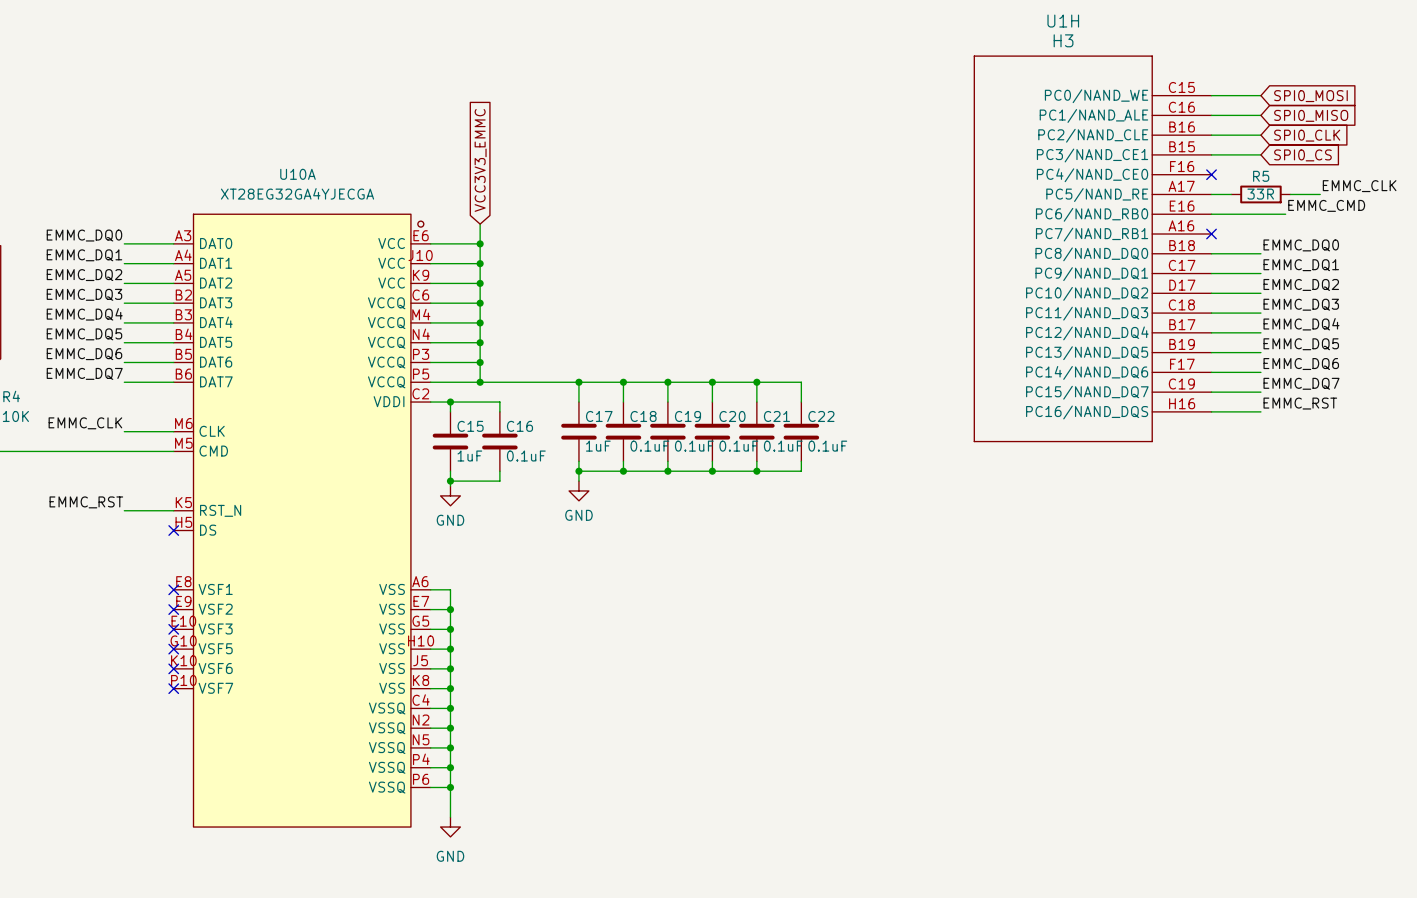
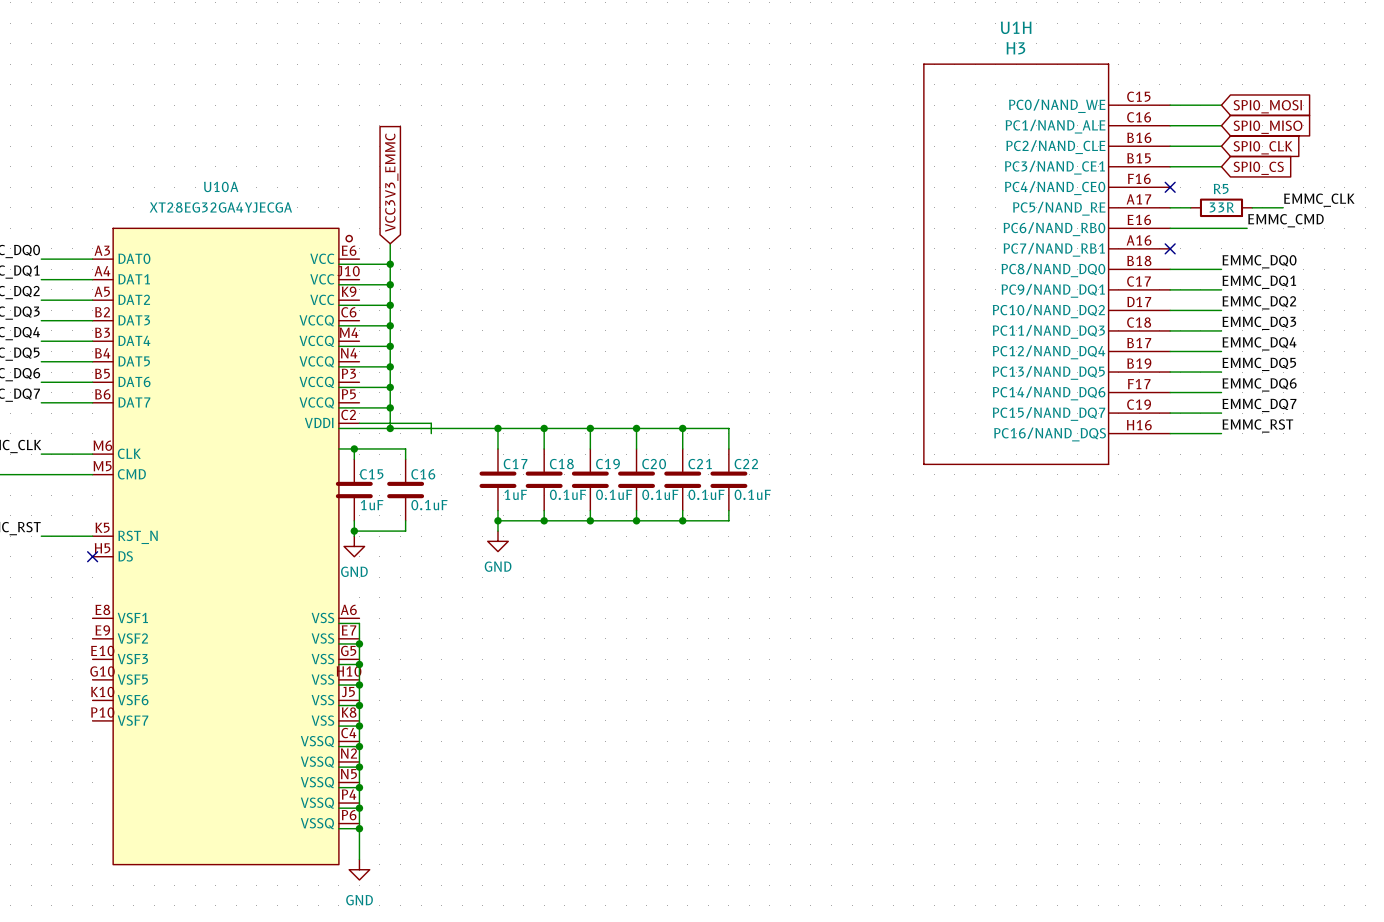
global label position: VCC3V3_EMMC (480, 160) -> VCC3V3_EMMC (391, 182)
wire: (480, 224) (480, 382) -> none
wire: none -> (390, 243) (390, 428)
wire: (430, 243) (480, 243) -> (338, 264) (390, 264)
junction: (480, 243) -> none
junction: none -> (390, 264)
wire: (430, 263) (480, 263) -> (338, 284) (390, 284)
junction: (480, 263) -> none
junction: none -> (390, 284)
wire: (430, 283) (480, 283) -> (338, 305) (390, 305)
junction: (480, 283) -> none
junction: none -> (390, 305)
wire: (430, 303) (480, 303) -> (338, 325) (390, 325)
junction: (480, 303) -> none
junction: none -> (390, 325)
wire: (430, 322) (480, 322) -> (338, 346) (390, 346)
junction: (480, 322) -> none
junction: none -> (390, 346)
wire: (430, 342) (480, 342) -> (338, 366) (390, 366)
junction: (480, 342) -> none
junction: none -> (390, 366)
wire: (430, 362) (480, 362) -> (338, 387) (390, 387)
junction: (480, 362) -> none
junction: none -> (390, 387)
wire: (430, 382) (801, 382) (801, 402) -> none
junction: (480, 382) -> none
wire: (578, 382) (578, 402) -> (497, 428) (497, 448)
junction: (578, 382) -> none
wire: (623, 382) (623, 402) -> (544, 428) (544, 448)
junction: (623, 382) -> none
wire: (667, 382) (667, 402) -> (590, 428) (590, 448)
junction: (667, 382) -> none
wire: (712, 382) (712, 402) -> (636, 428) (636, 448)
junction: (712, 382) -> none
wire: (756, 382) (756, 402) -> (682, 428) (682, 448)
junction: (756, 382) -> none
wire: none -> (338, 407) (390, 407)
junction: none -> (390, 407)
wire: (450, 402) (450, 411) -> (354, 448) (354, 459)
junction: (450, 402) -> none
wire: none -> (338, 428) (728, 428) (728, 448)
junction: none -> (390, 428)
junction: none -> (497, 428)
junction: none -> (544, 428)
junction: none -> (590, 428)
junction: none -> (636, 428)
junction: none -> (682, 428)
wire: none -> (338, 448) (405, 448) (405, 459)
junction: none -> (354, 448)
C17 position: (578, 431) -> (497, 479)
C18 position: (623, 431) -> (544, 479)
C19 position: (667, 431) -> (590, 479)
C20 position: (712, 431) -> (636, 479)
C21 position: (756, 431) -> (682, 479)
C22 position: (801, 431) -> (728, 479)
C15 position: (450, 441) -> (354, 490)
C16 position: (499, 441) -> (405, 490)
wire: (578, 461) (578, 481) -> (497, 510) (497, 531)
wire: (623, 461) (623, 471) -> (544, 510) (544, 520)
wire: (667, 461) (667, 471) -> (590, 510) (590, 520)
wire: (712, 461) (712, 471) -> (636, 510) (636, 520)
wire: (756, 461) (756, 471) -> (682, 510) (682, 520)
wire: (801, 461) (801, 471) (578, 471) -> (728, 510) (728, 520) (497, 520)
wire: (450, 471) (450, 486) -> (354, 520) (354, 536)
wire: (499, 471) (499, 481) (450, 481) -> (405, 520) (405, 531) (354, 531)
junction: (578, 471) -> none
junction: (623, 471) -> none
junction: (667, 471) -> none
junction: (712, 471) -> none
junction: (756, 471) -> none
junction: (450, 481) -> none
power symbol position: GND (578, 490) -> GND (497, 541)
power symbol position: GND (450, 495) -> GND (354, 546)
junction: none -> (497, 520)
junction: none -> (544, 520)
junction: none -> (590, 520)
junction: none -> (636, 520)
junction: none -> (682, 520)
junction: none -> (354, 531)
no-connect mark: (173, 589) -> none
wire: (430, 589) (450, 589) (450, 817) -> (338, 623) (359, 623) (359, 859)
no-connect mark: (173, 609) -> none
wire: (430, 609) (450, 609) -> (338, 643) (359, 643)
junction: (450, 609) -> none
junction: none -> (359, 643)
no-connect mark: (173, 629) -> none
wire: (430, 629) (450, 629) -> (338, 664) (359, 664)
junction: (450, 629) -> none
junction: none -> (359, 664)
no-connect mark: (173, 649) -> none
wire: (430, 649) (450, 649) -> (338, 685) (359, 685)
junction: (450, 649) -> none
junction: none -> (359, 685)
no-connect mark: (173, 668) -> none
wire: (430, 668) (450, 668) -> (338, 705) (359, 705)
junction: (450, 668) -> none
junction: none -> (359, 705)
no-connect mark: (173, 688) -> none
wire: (430, 688) (450, 688) -> (338, 726) (359, 726)
junction: (450, 688) -> none
junction: none -> (359, 726)
wire: (430, 708) (450, 708) -> (338, 746) (359, 746)
junction: (450, 708) -> none
junction: none -> (359, 746)
wire: (430, 728) (450, 728) -> (338, 767) (359, 767)
junction: (450, 728) -> none
junction: none -> (359, 767)
wire: (430, 747) (450, 747) -> (338, 787) (359, 787)
junction: (450, 747) -> none
junction: none -> (359, 787)
wire: (430, 767) (450, 767) -> (338, 808) (359, 808)
junction: (450, 767) -> none
junction: none -> (359, 808)
wire: (430, 787) (450, 787) -> (338, 828) (359, 828)
junction: (450, 787) -> none
junction: none -> (359, 828)
power symbol position: GND (450, 827) -> GND (359, 869)

